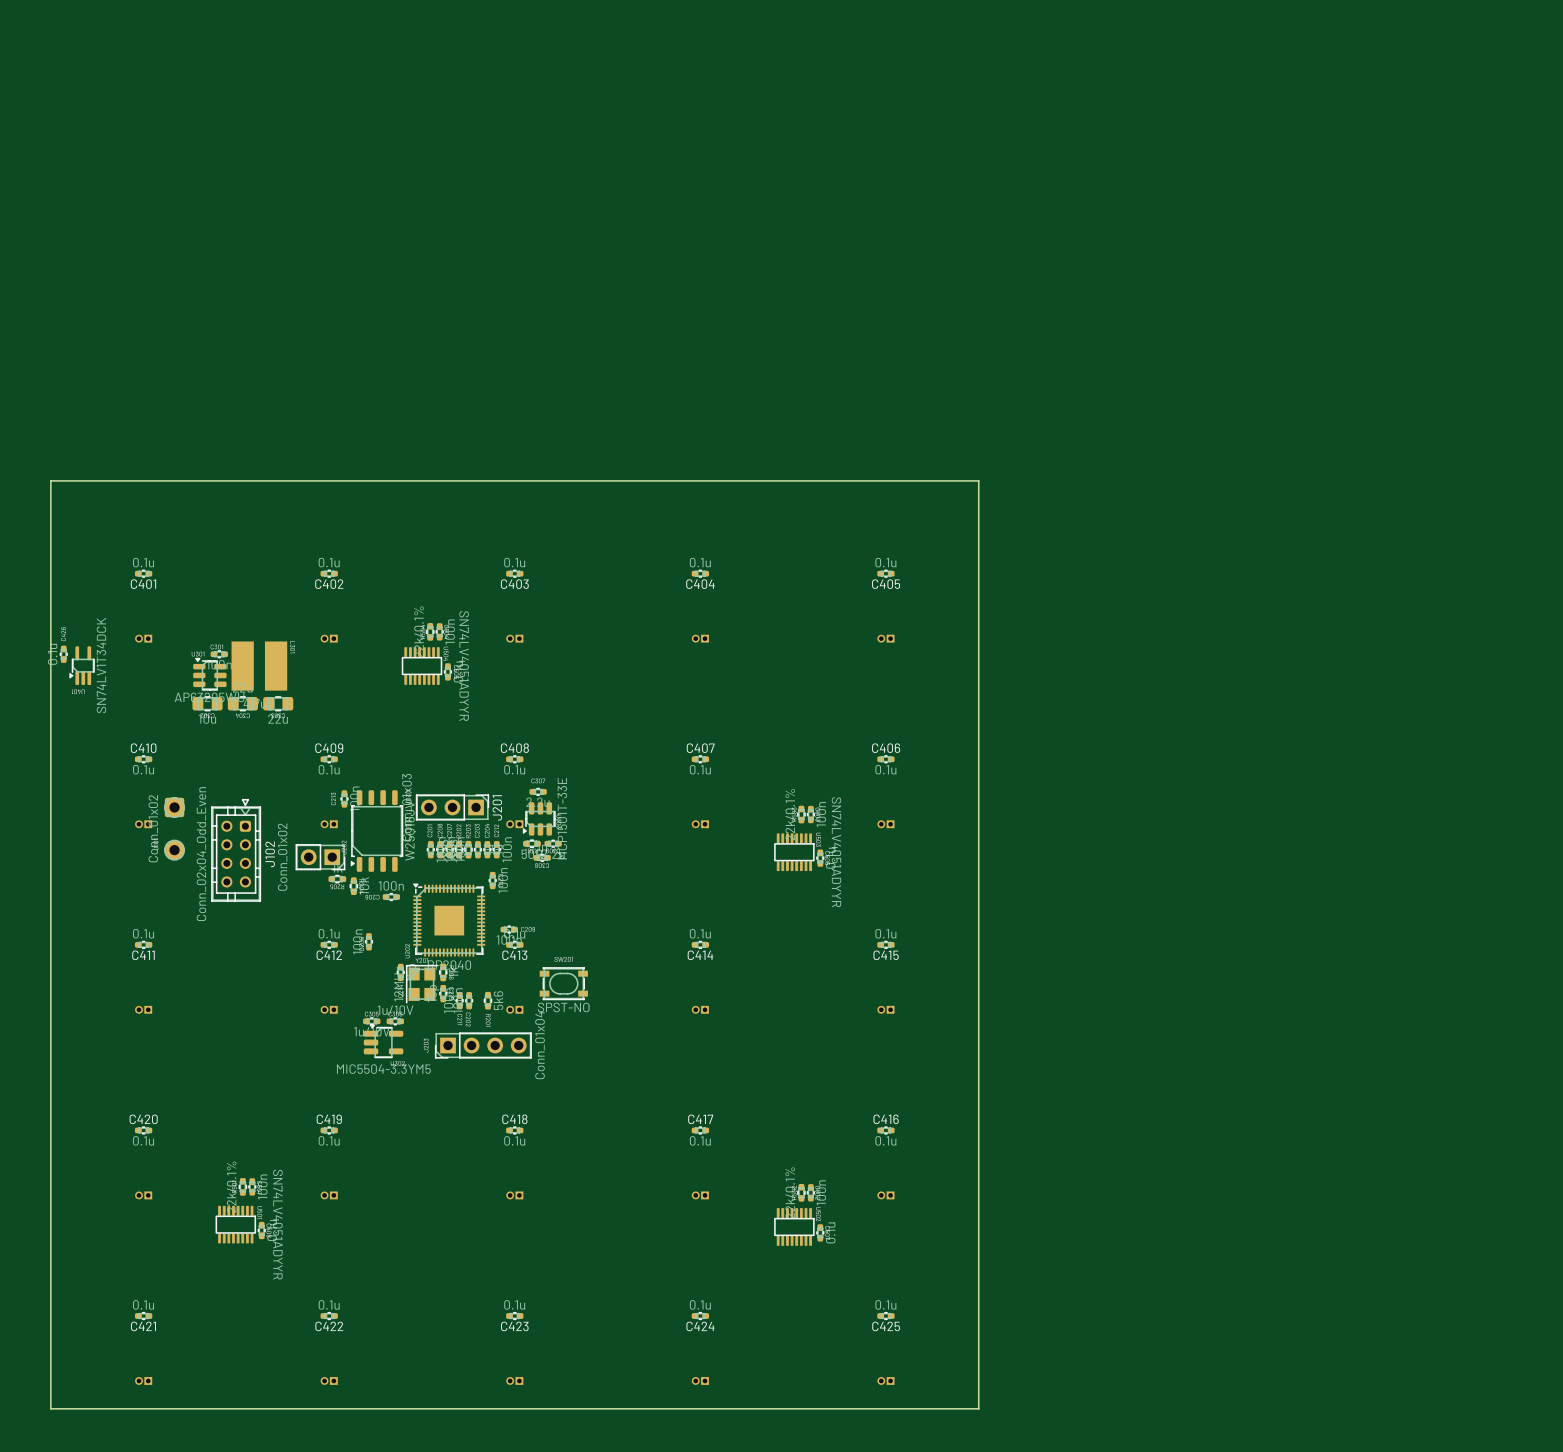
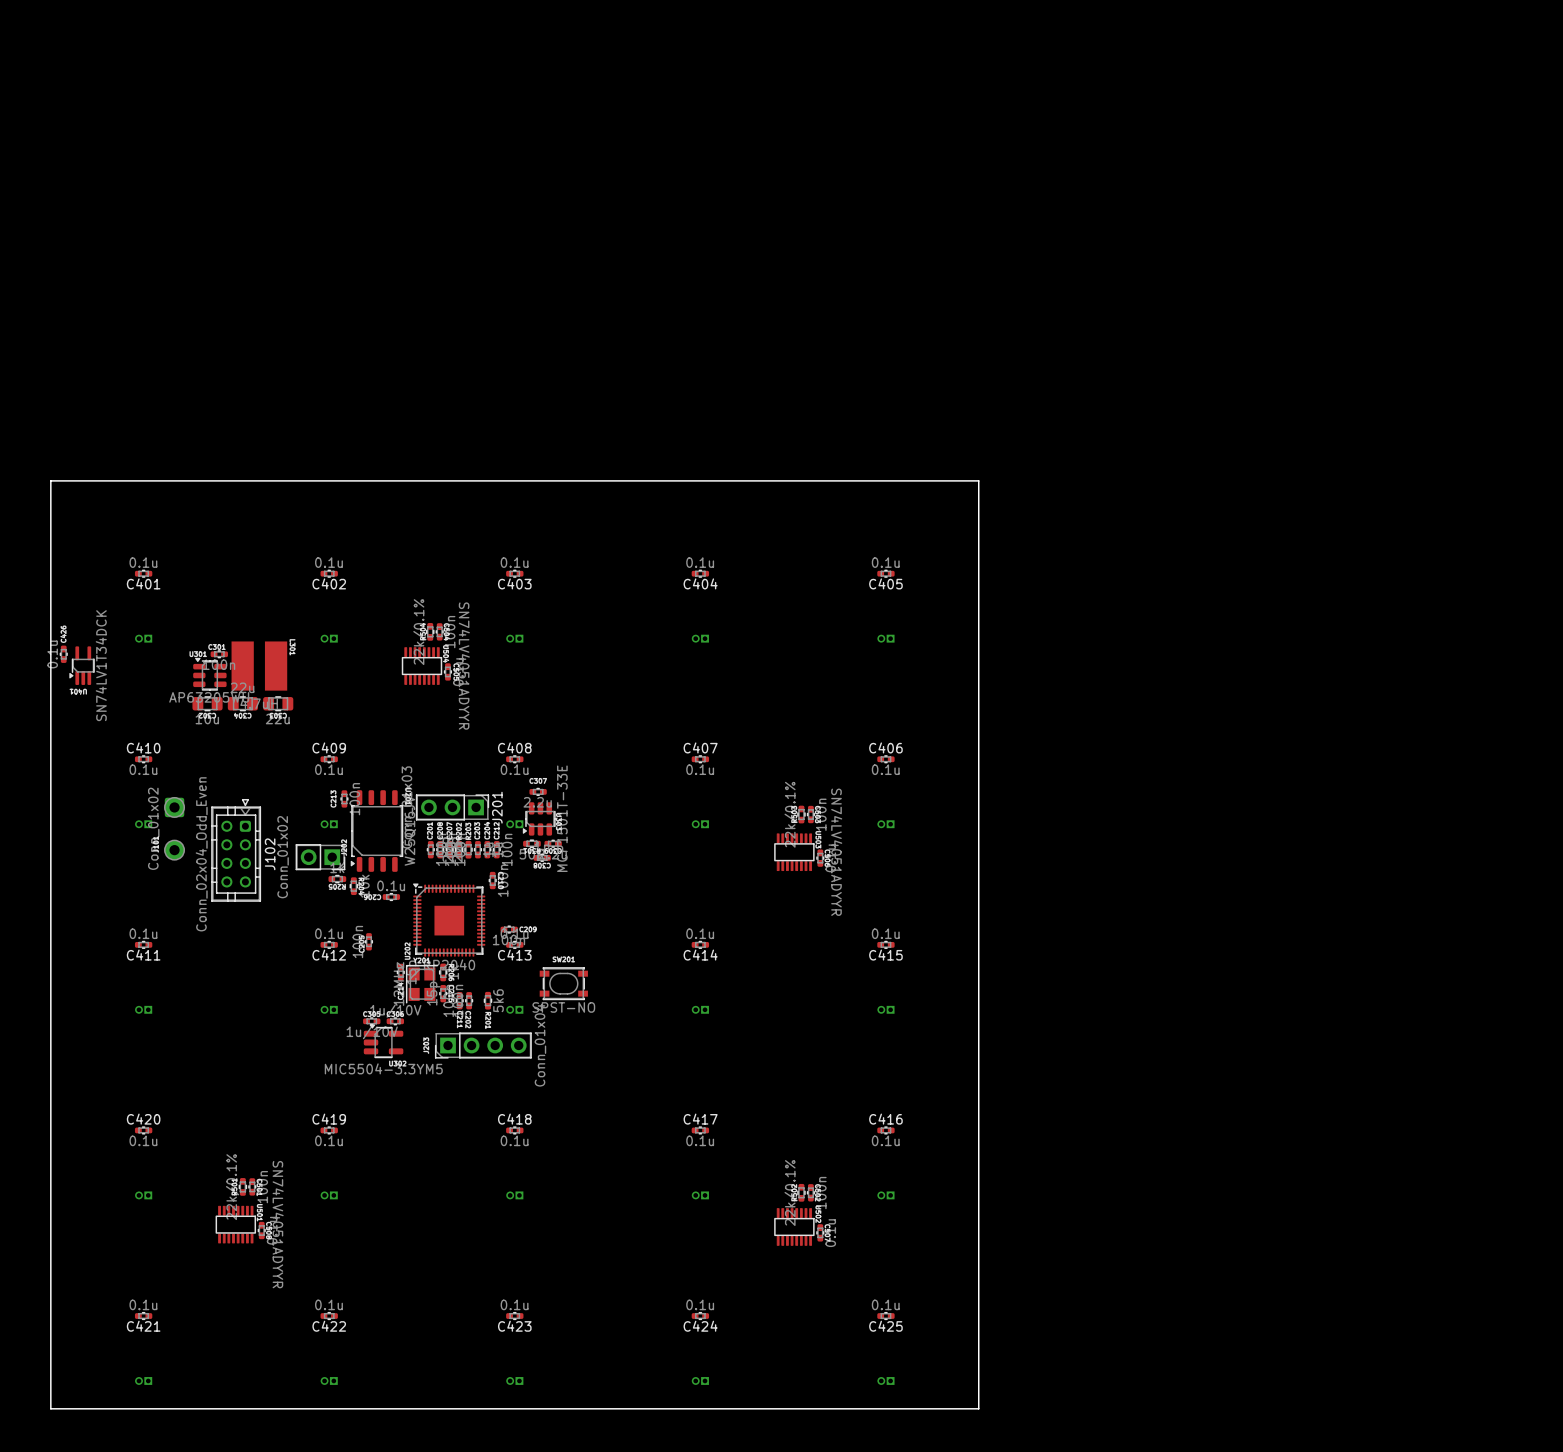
part value: 100n (391, 885) -> 0.1u (391, 885)

